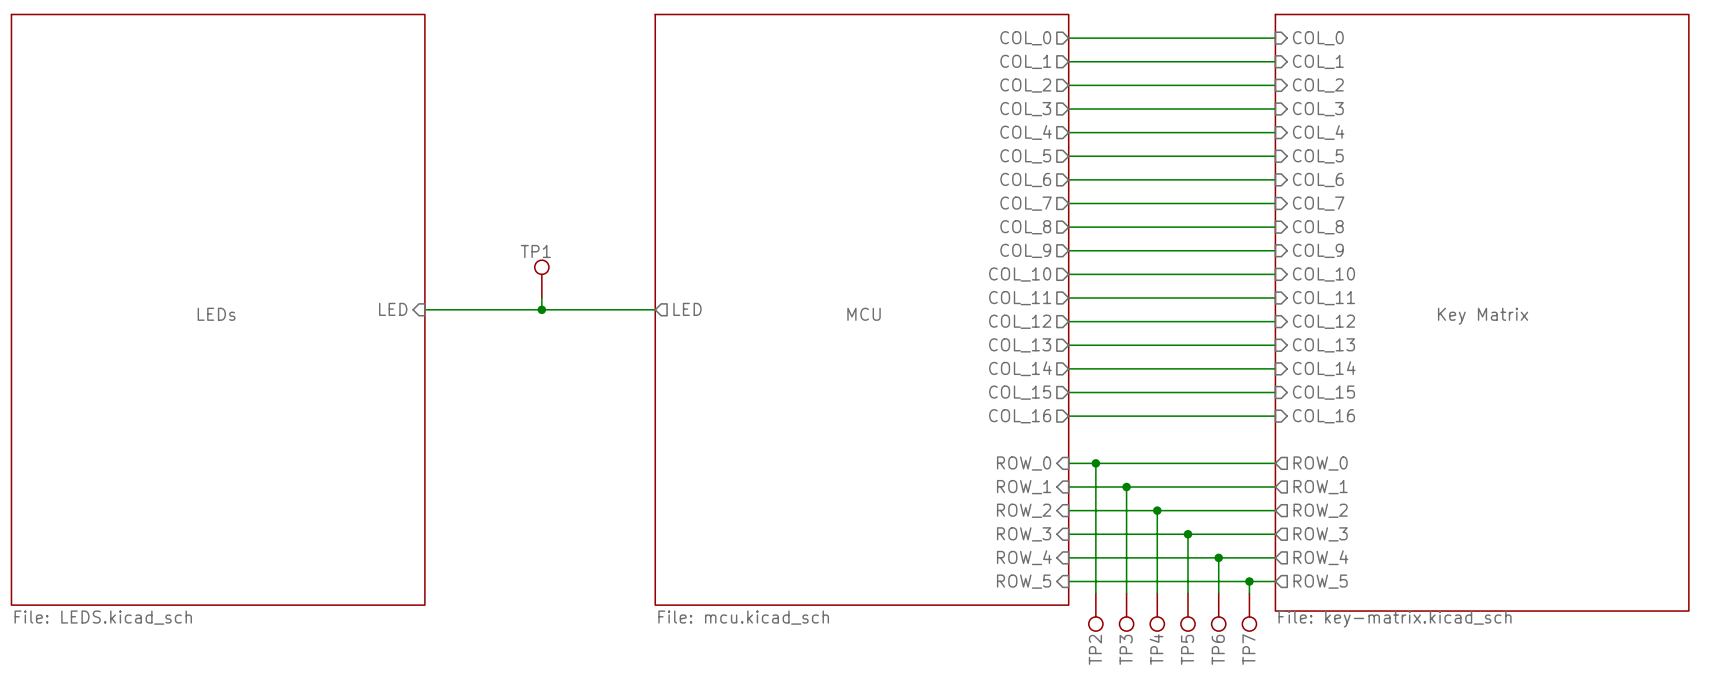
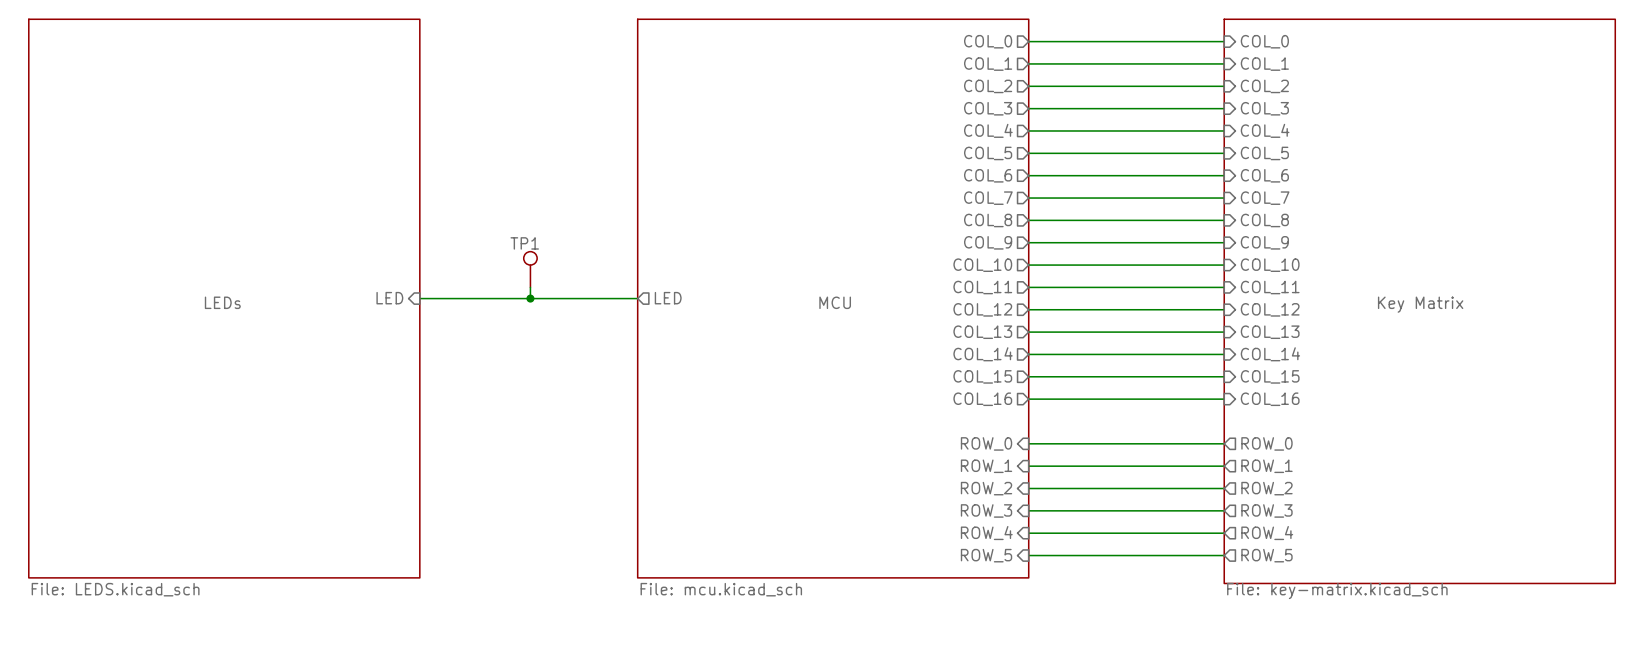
wire: (1095, 463) (1095, 593) -> none
junction: (1095, 463) -> none
wire: (1126, 487) (1126, 593) -> none
junction: (1126, 487) -> none
wire: (1157, 510) (1157, 593) -> none
junction: (1157, 510) -> none
wire: (1188, 534) (1188, 593) -> none
junction: (1188, 534) -> none
wire: (1218, 557) (1218, 593) -> none
junction: (1218, 557) -> none
wire: (1249, 581) (1249, 593) -> none
junction: (1249, 581) -> none
TP2: (1095, 612) -> none
TP3: (1126, 612) -> none
TP4: (1157, 612) -> none
TP5: (1188, 612) -> none
TP6: (1218, 612) -> none
TP7: (1249, 612) -> none

